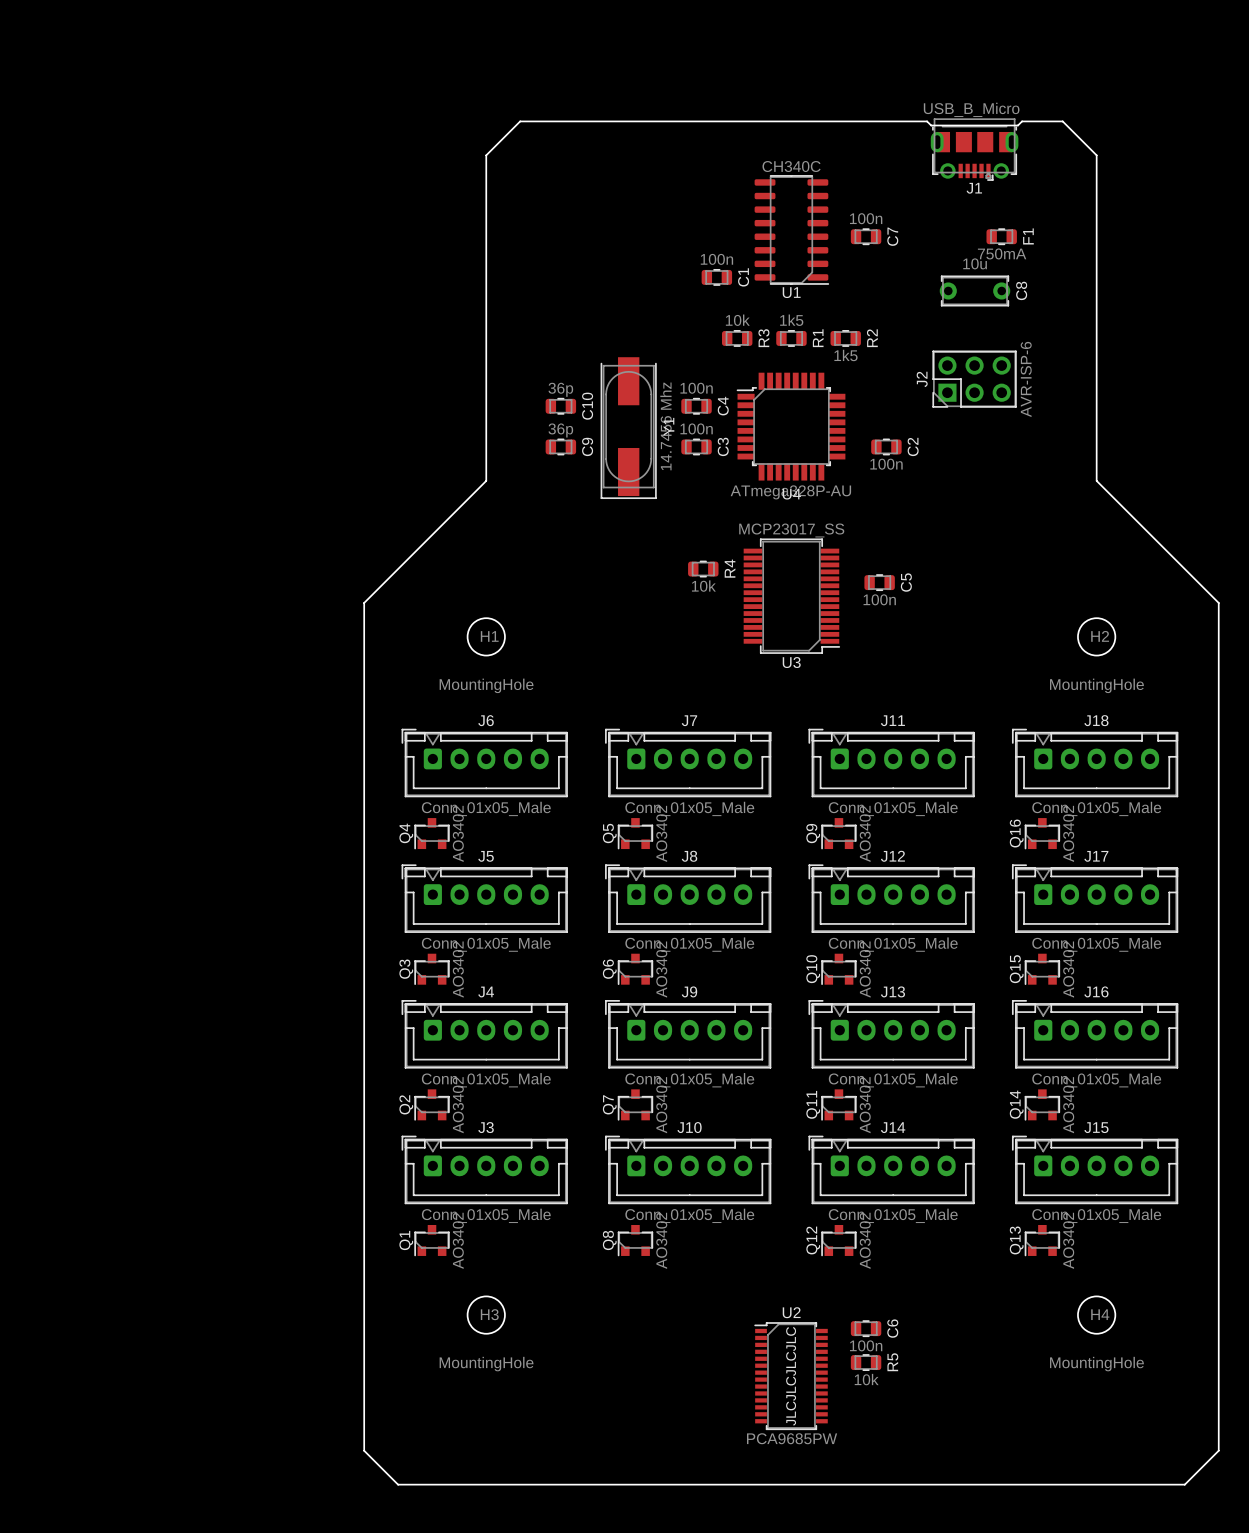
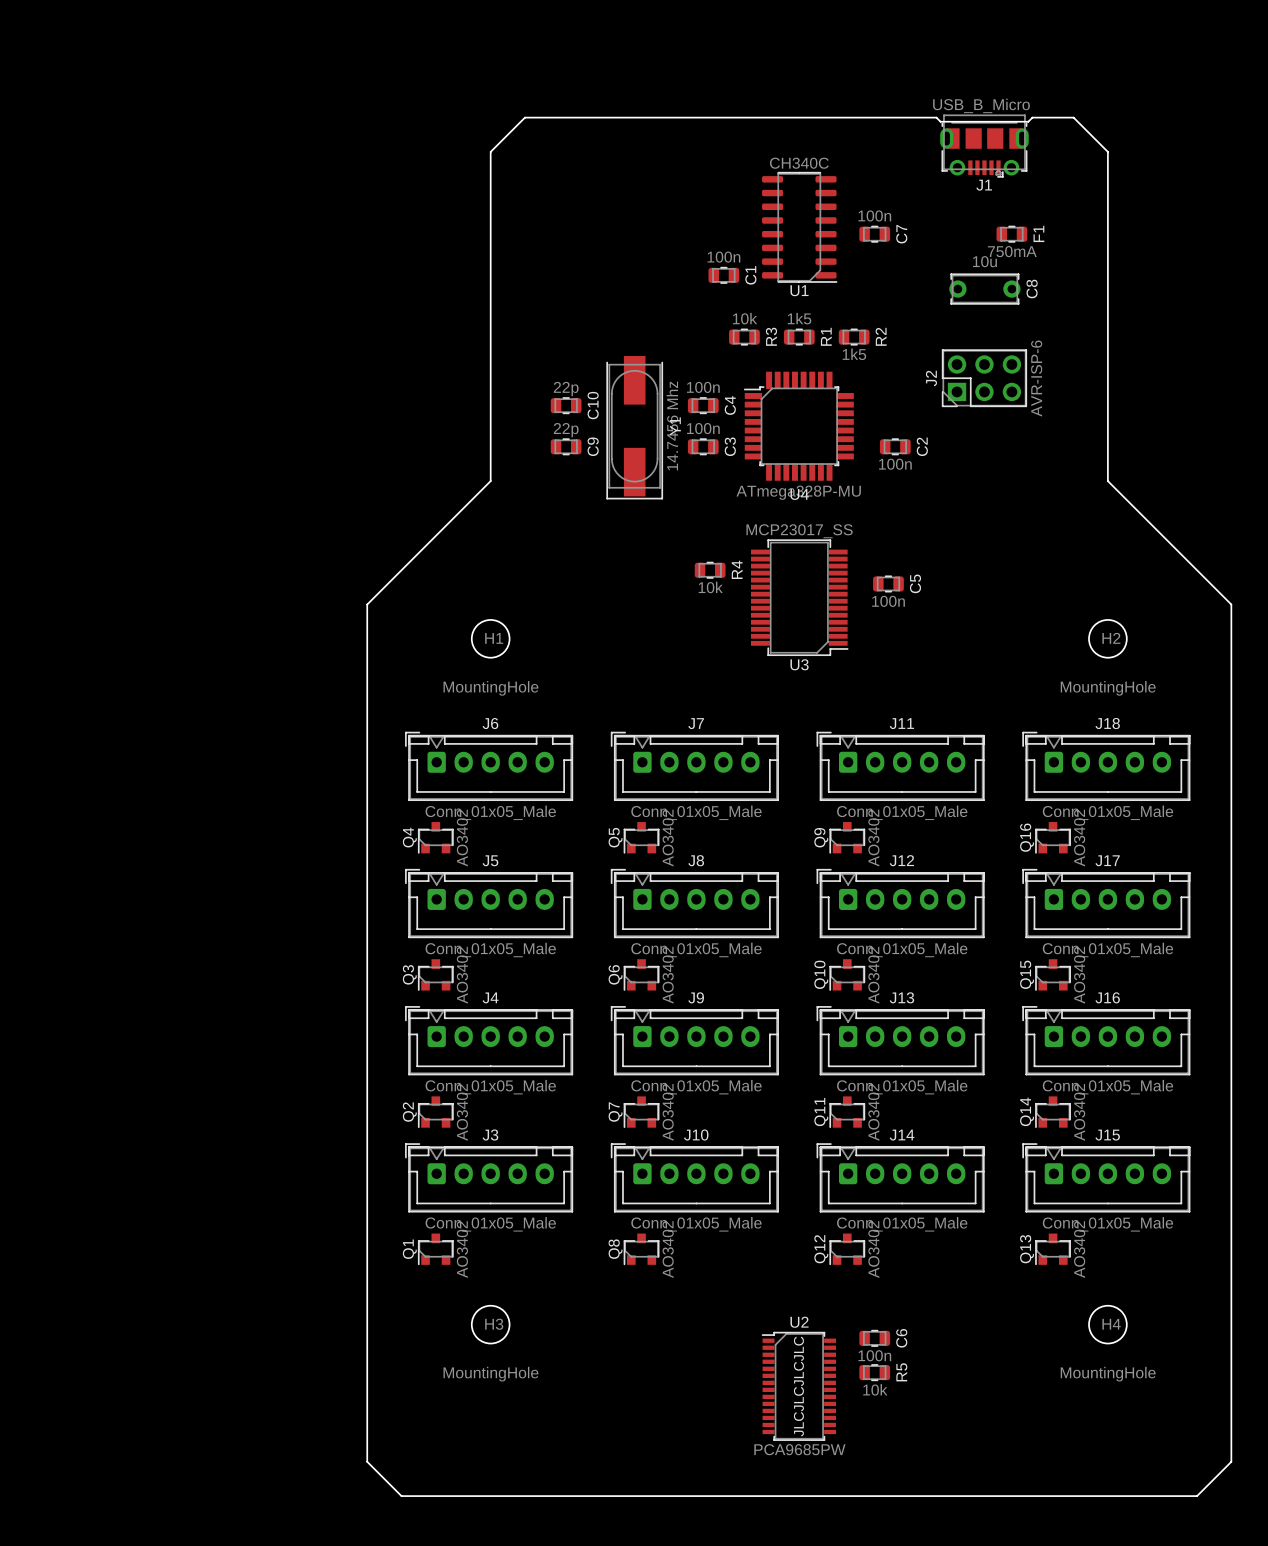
C10 value: 36p (560, 389) -> 22p (566, 388)
C9 value: 36p (560, 430) -> 22p (566, 430)
U4 value: ATmega328P-AU (790, 492) -> ATmega328P-MU (798, 492)

